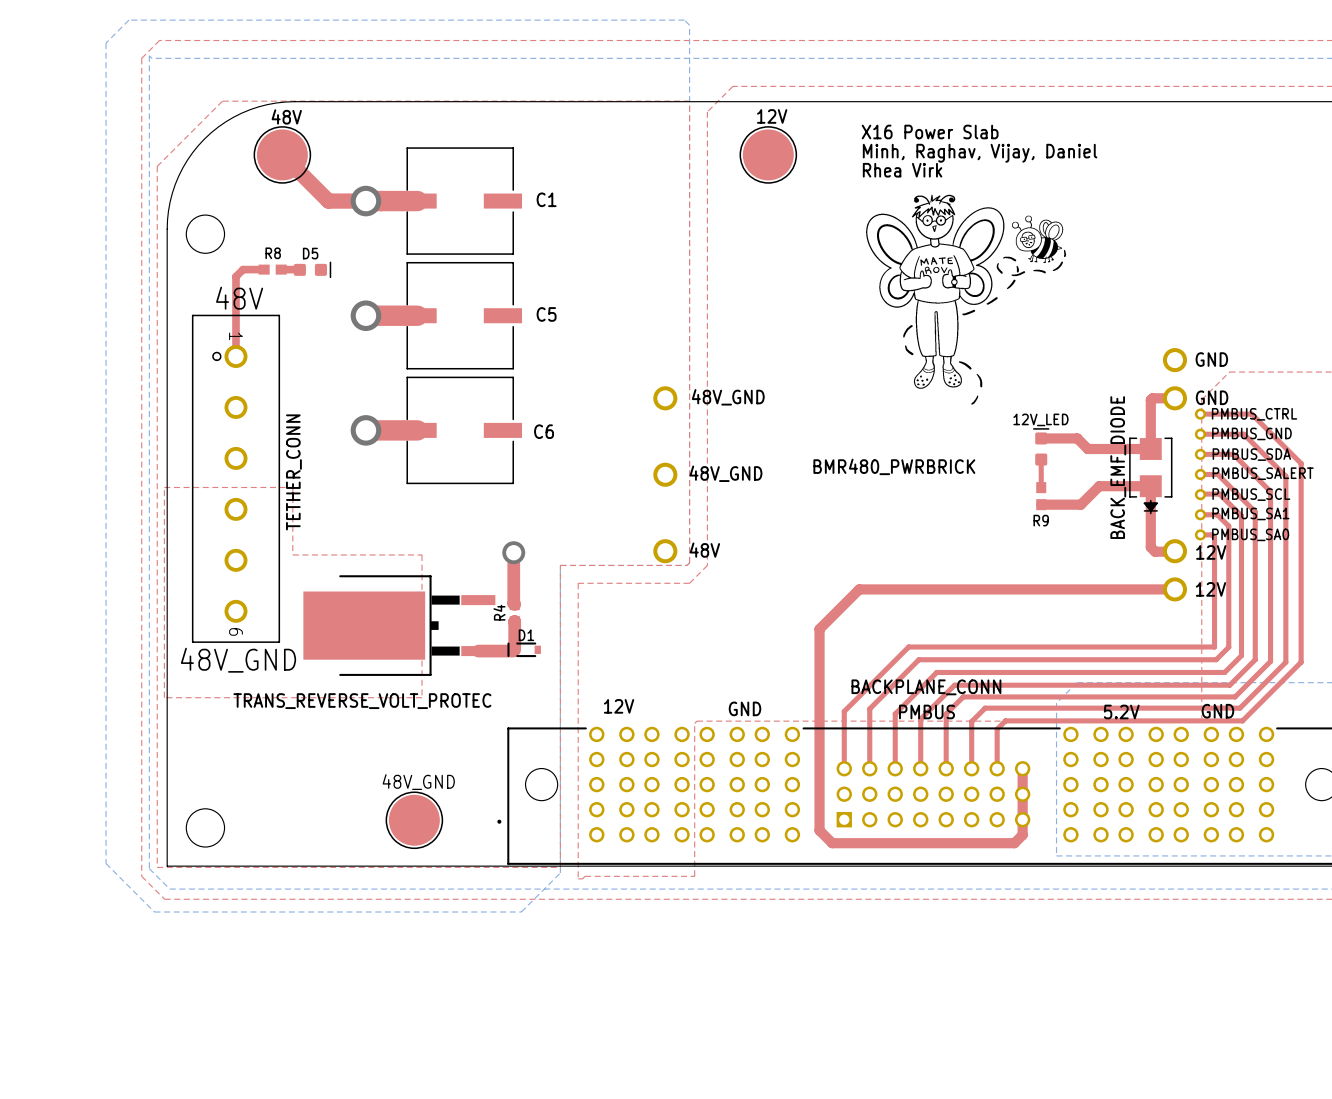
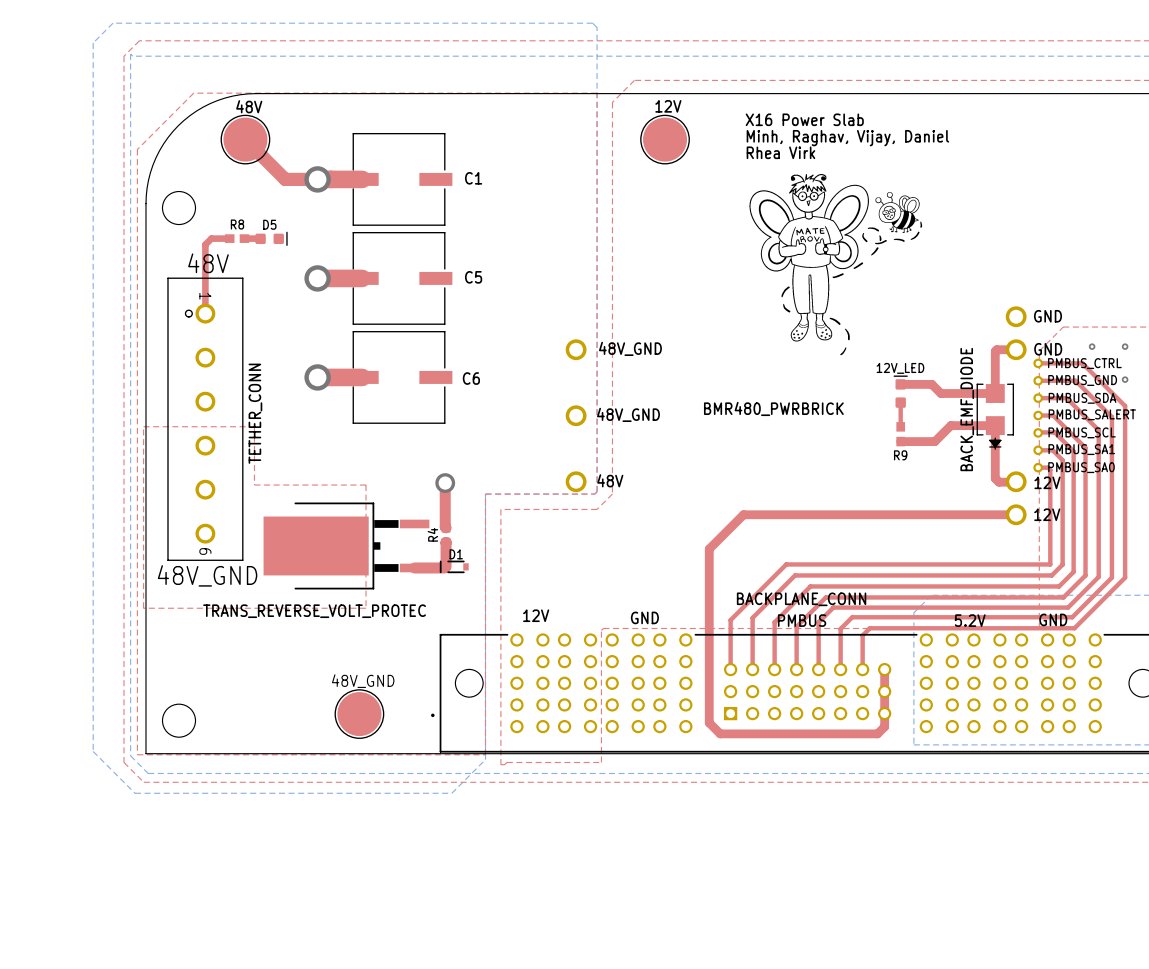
via: none -> (1092, 346)
via: none -> (1125, 346)
via: none -> (1125, 379)

